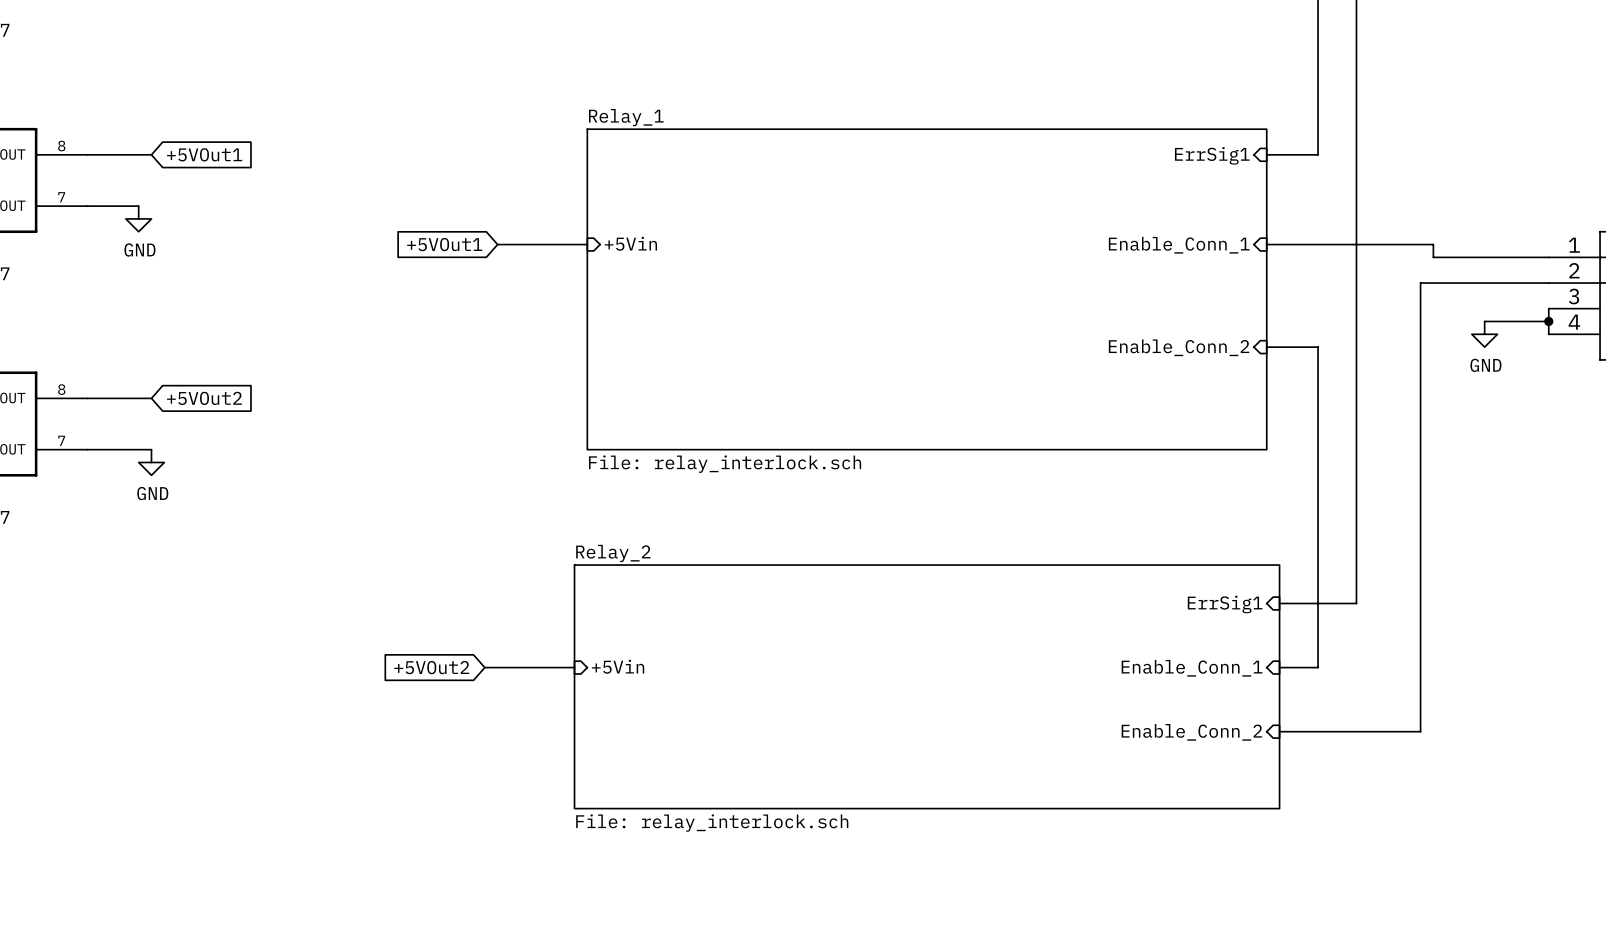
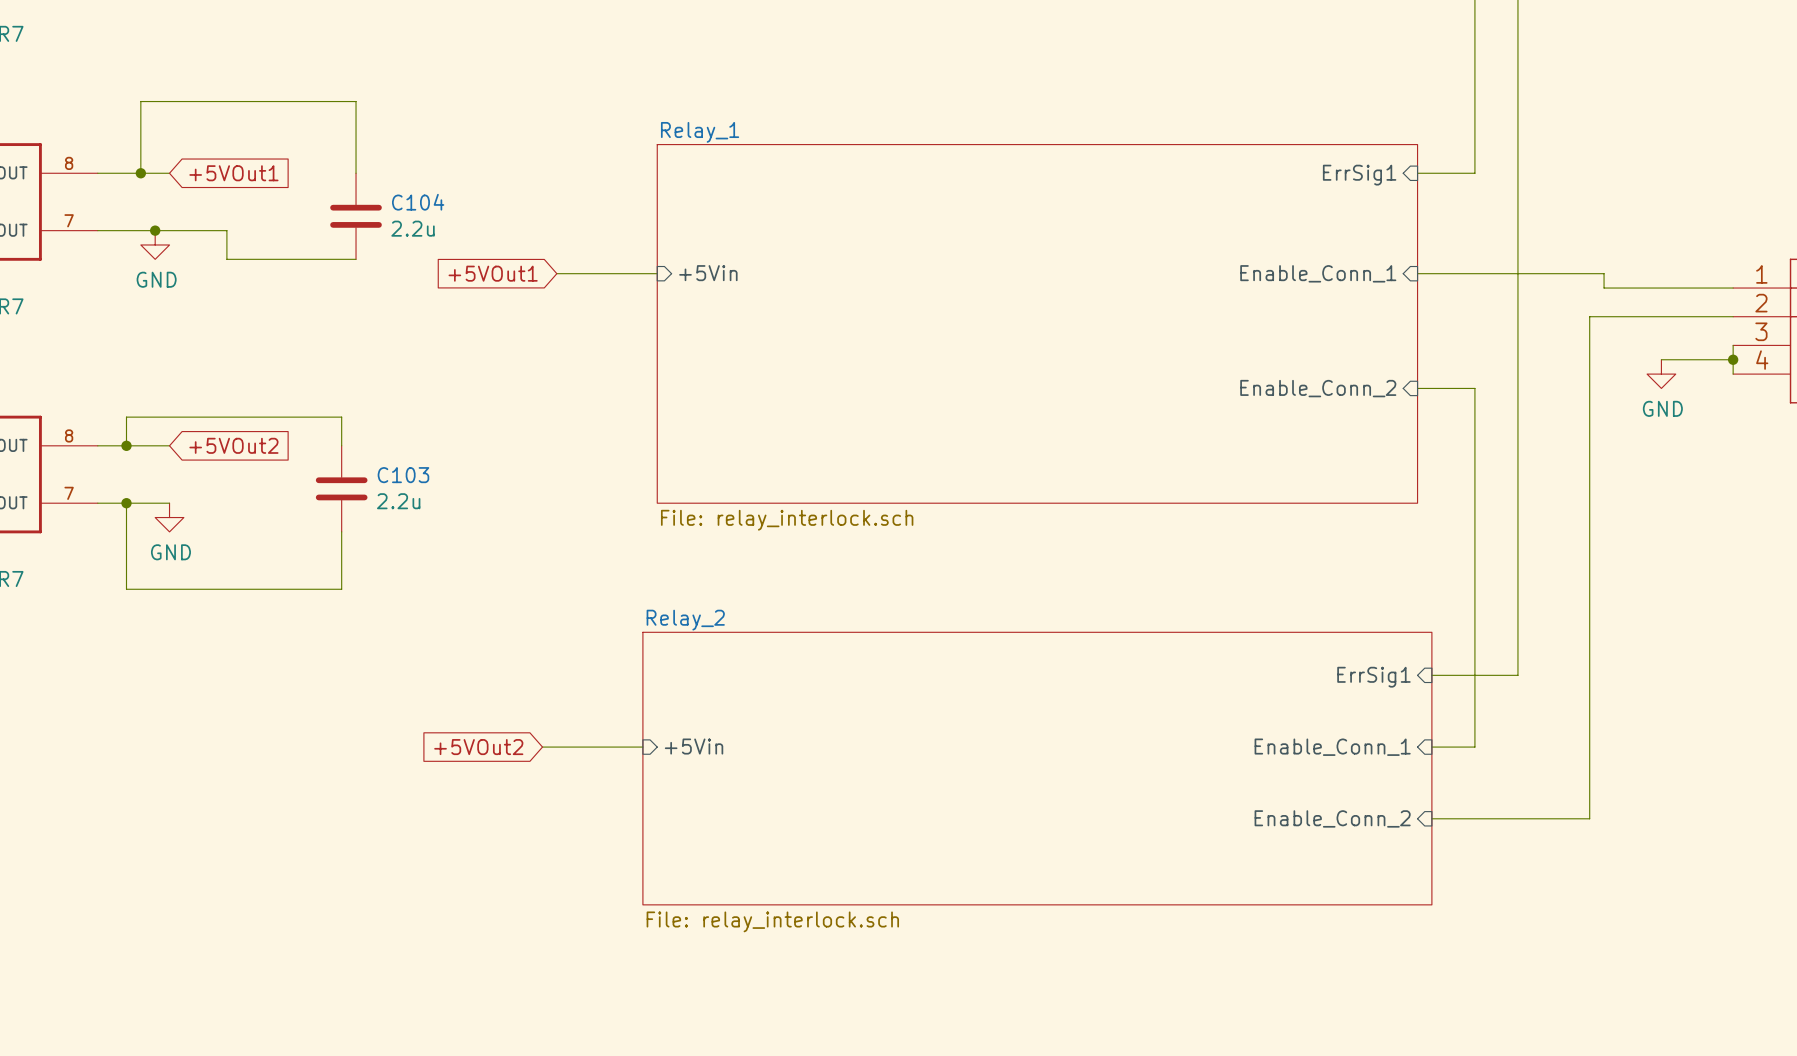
wire: none -> (140, 173) (140, 101) (356, 101) (356, 173)
junction: none -> (140, 173)
C104: none -> 2.2u (356, 216)
wire: none -> (155, 230) (226, 230) (226, 259) (356, 259)
junction: none -> (155, 230)
wire: none -> (126, 445) (126, 417) (341, 417) (341, 445)
junction: none -> (126, 445)
C103: none -> 2.2u (341, 488)
wire: none -> (126, 503) (126, 589) (341, 589) (341, 531)
junction: none -> (126, 503)

